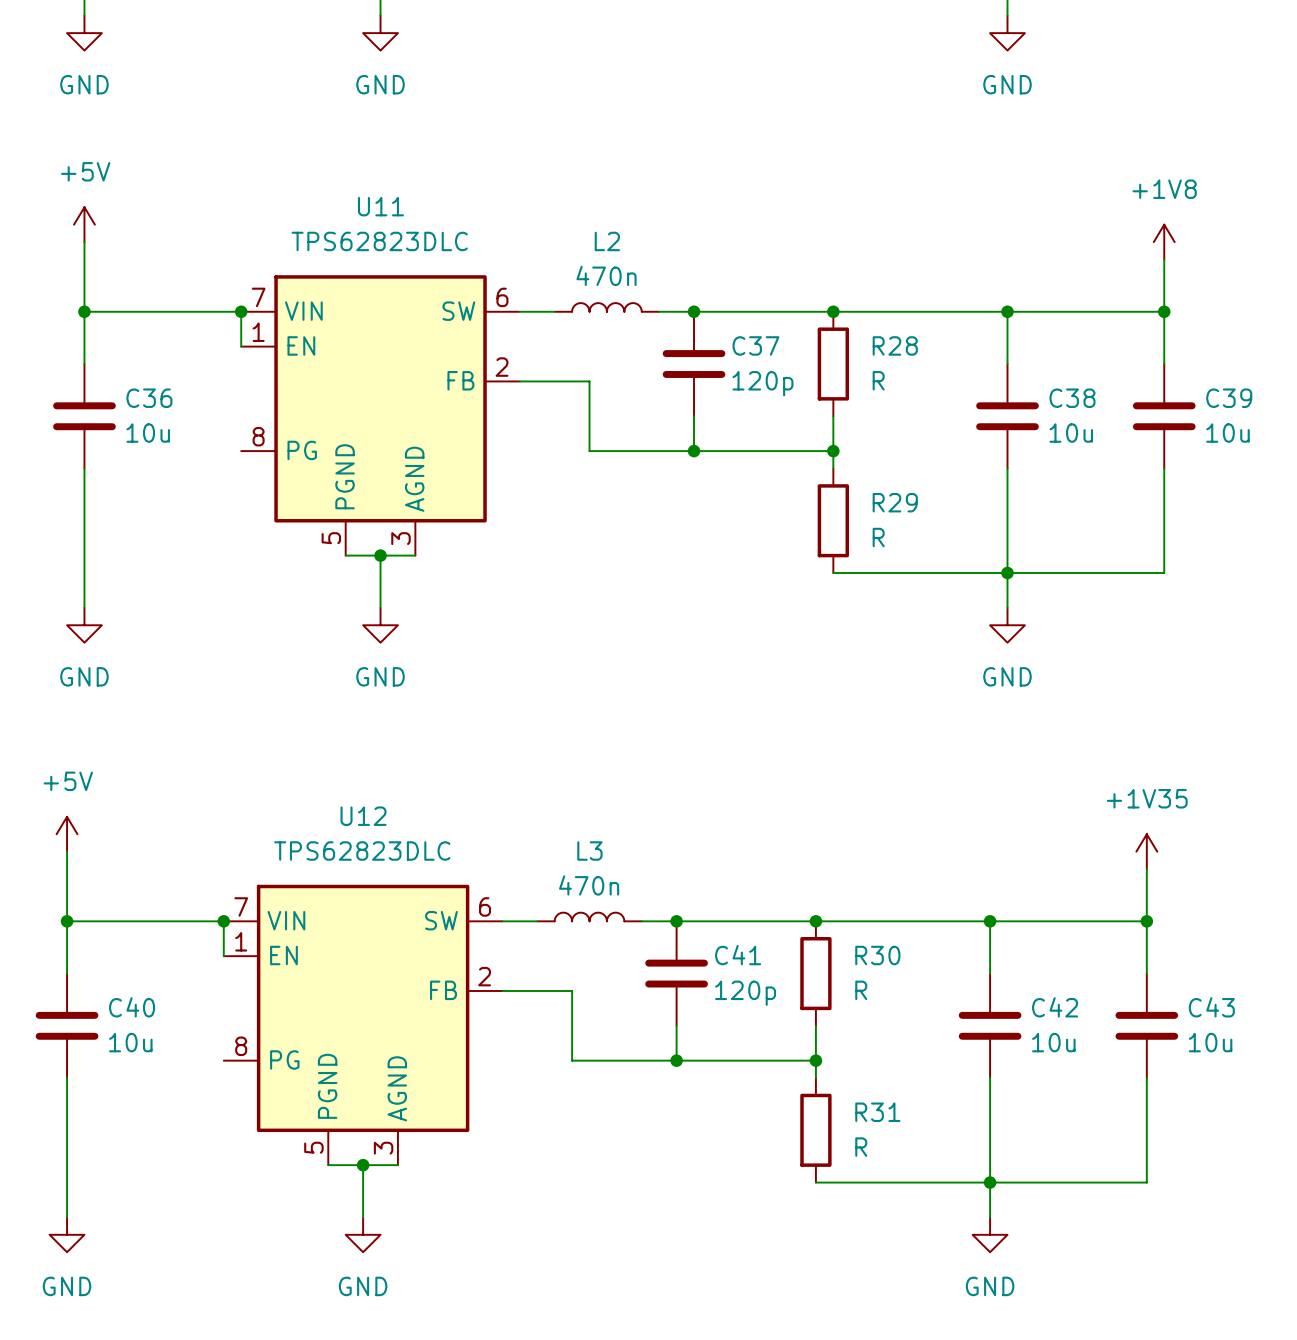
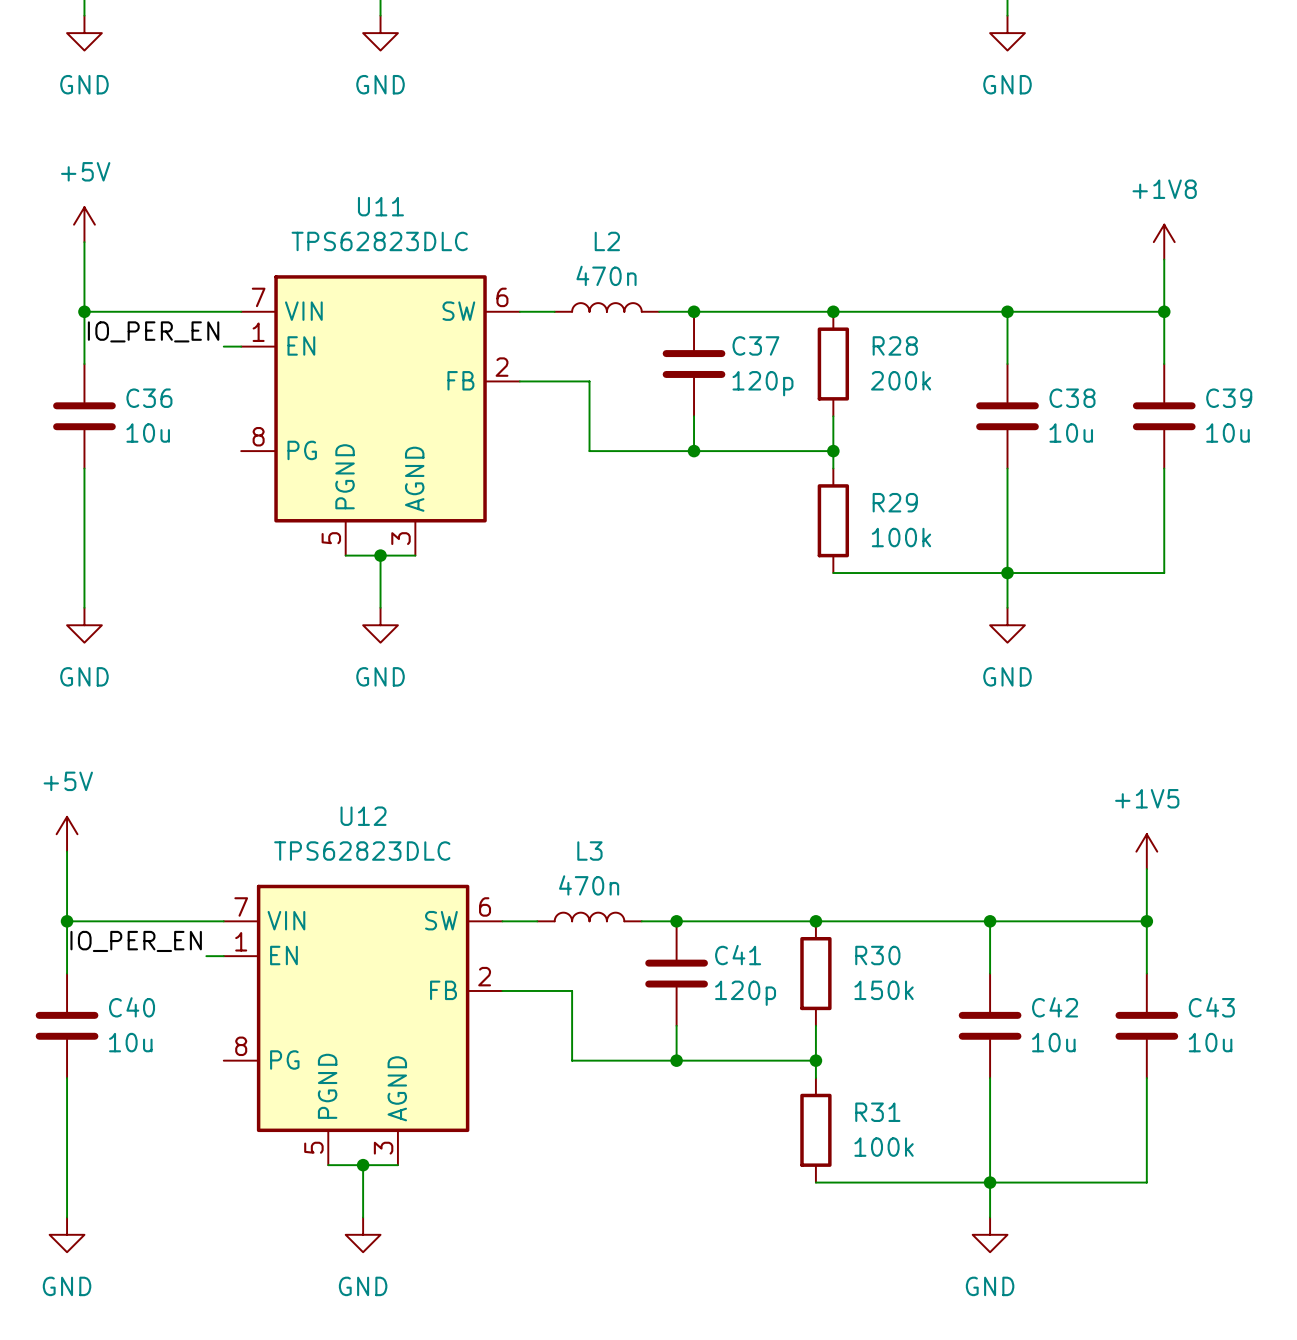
wire: (241, 311) (241, 346) -> (223, 346) (241, 346)
junction: (241, 311) -> none
label: none -> IO_PER_EN (153, 331)
R28 value: R (878, 380) -> 200k (901, 380)
R29 value: R (878, 537) -> 100k (901, 537)
power symbol: +1V35 (1146, 851) -> +1V5 (1146, 851)
wire: (223, 921) (223, 956) -> (206, 956) (223, 956)
junction: (223, 921) -> none
label: none -> IO_PER_EN (136, 941)
R30 value: R (861, 990) -> 150k (884, 990)
R31 value: R (861, 1147) -> 100k (884, 1147)

